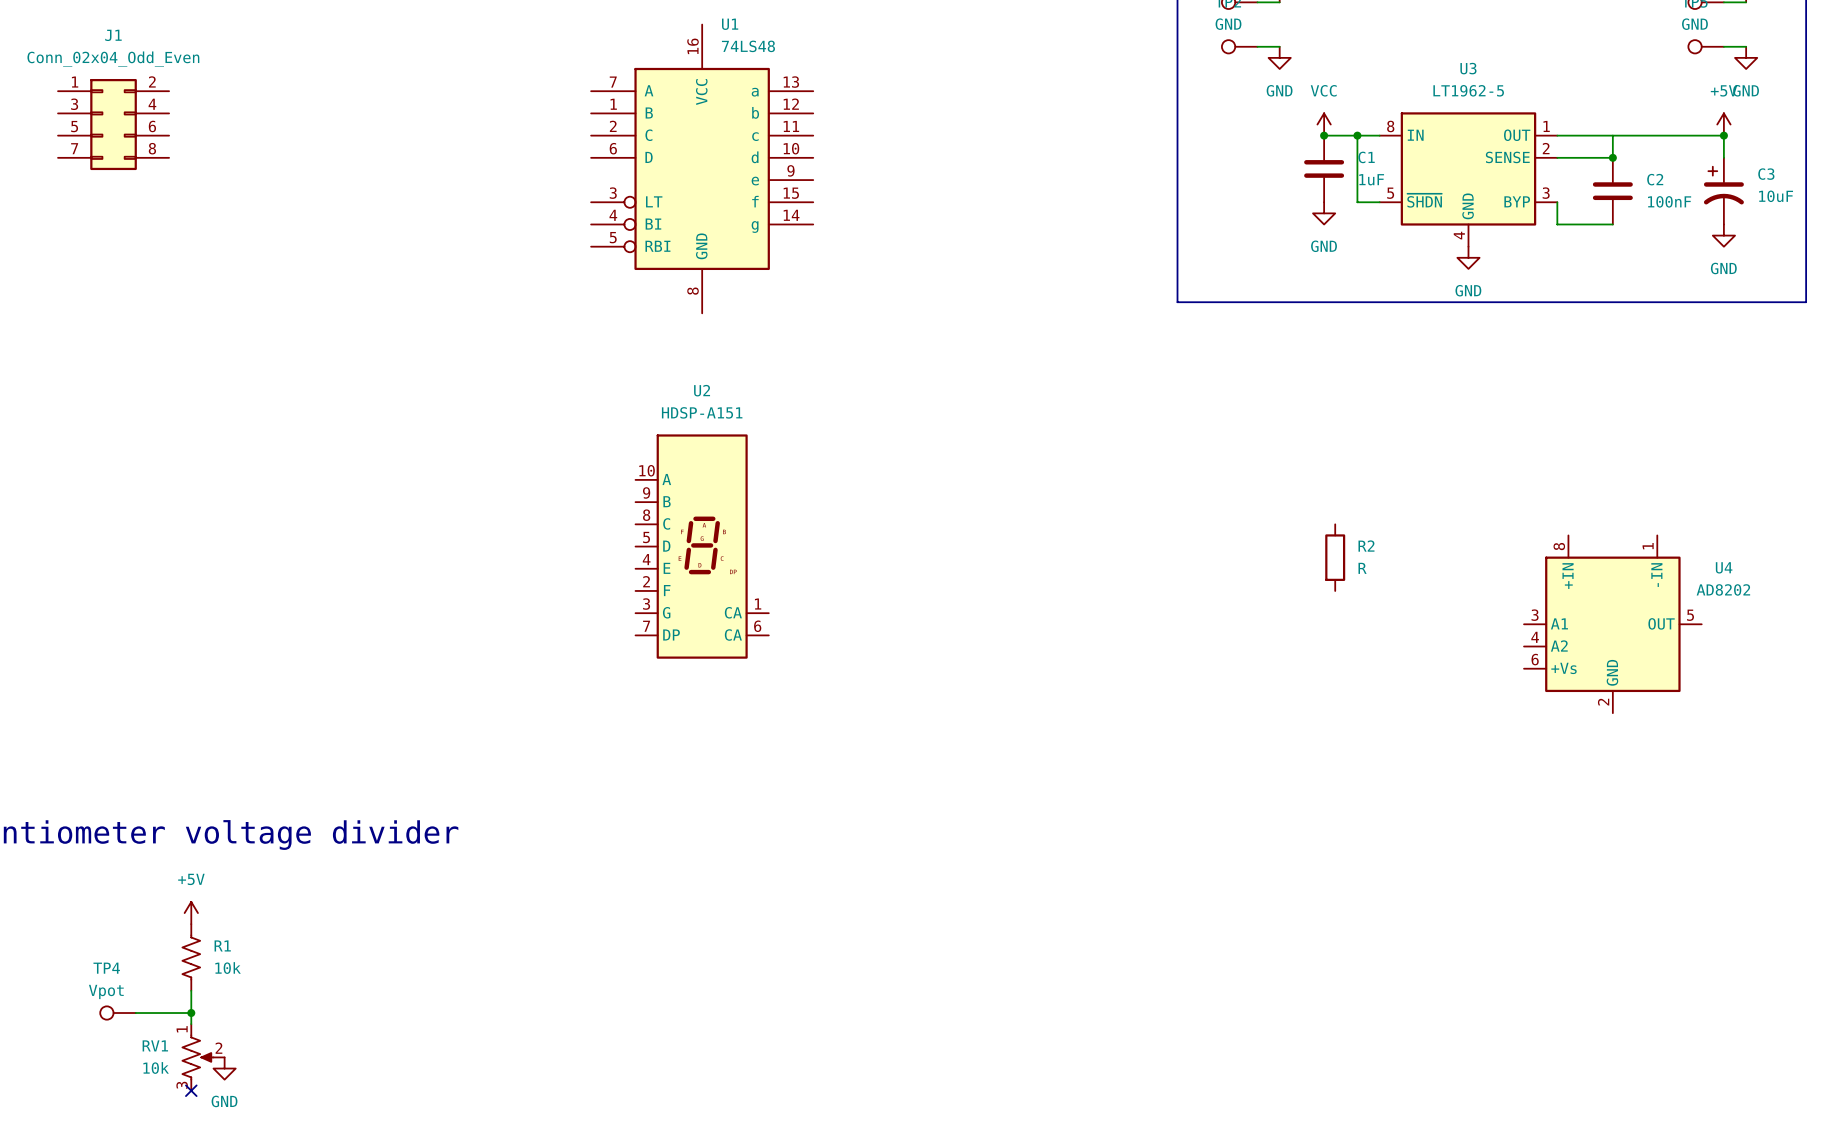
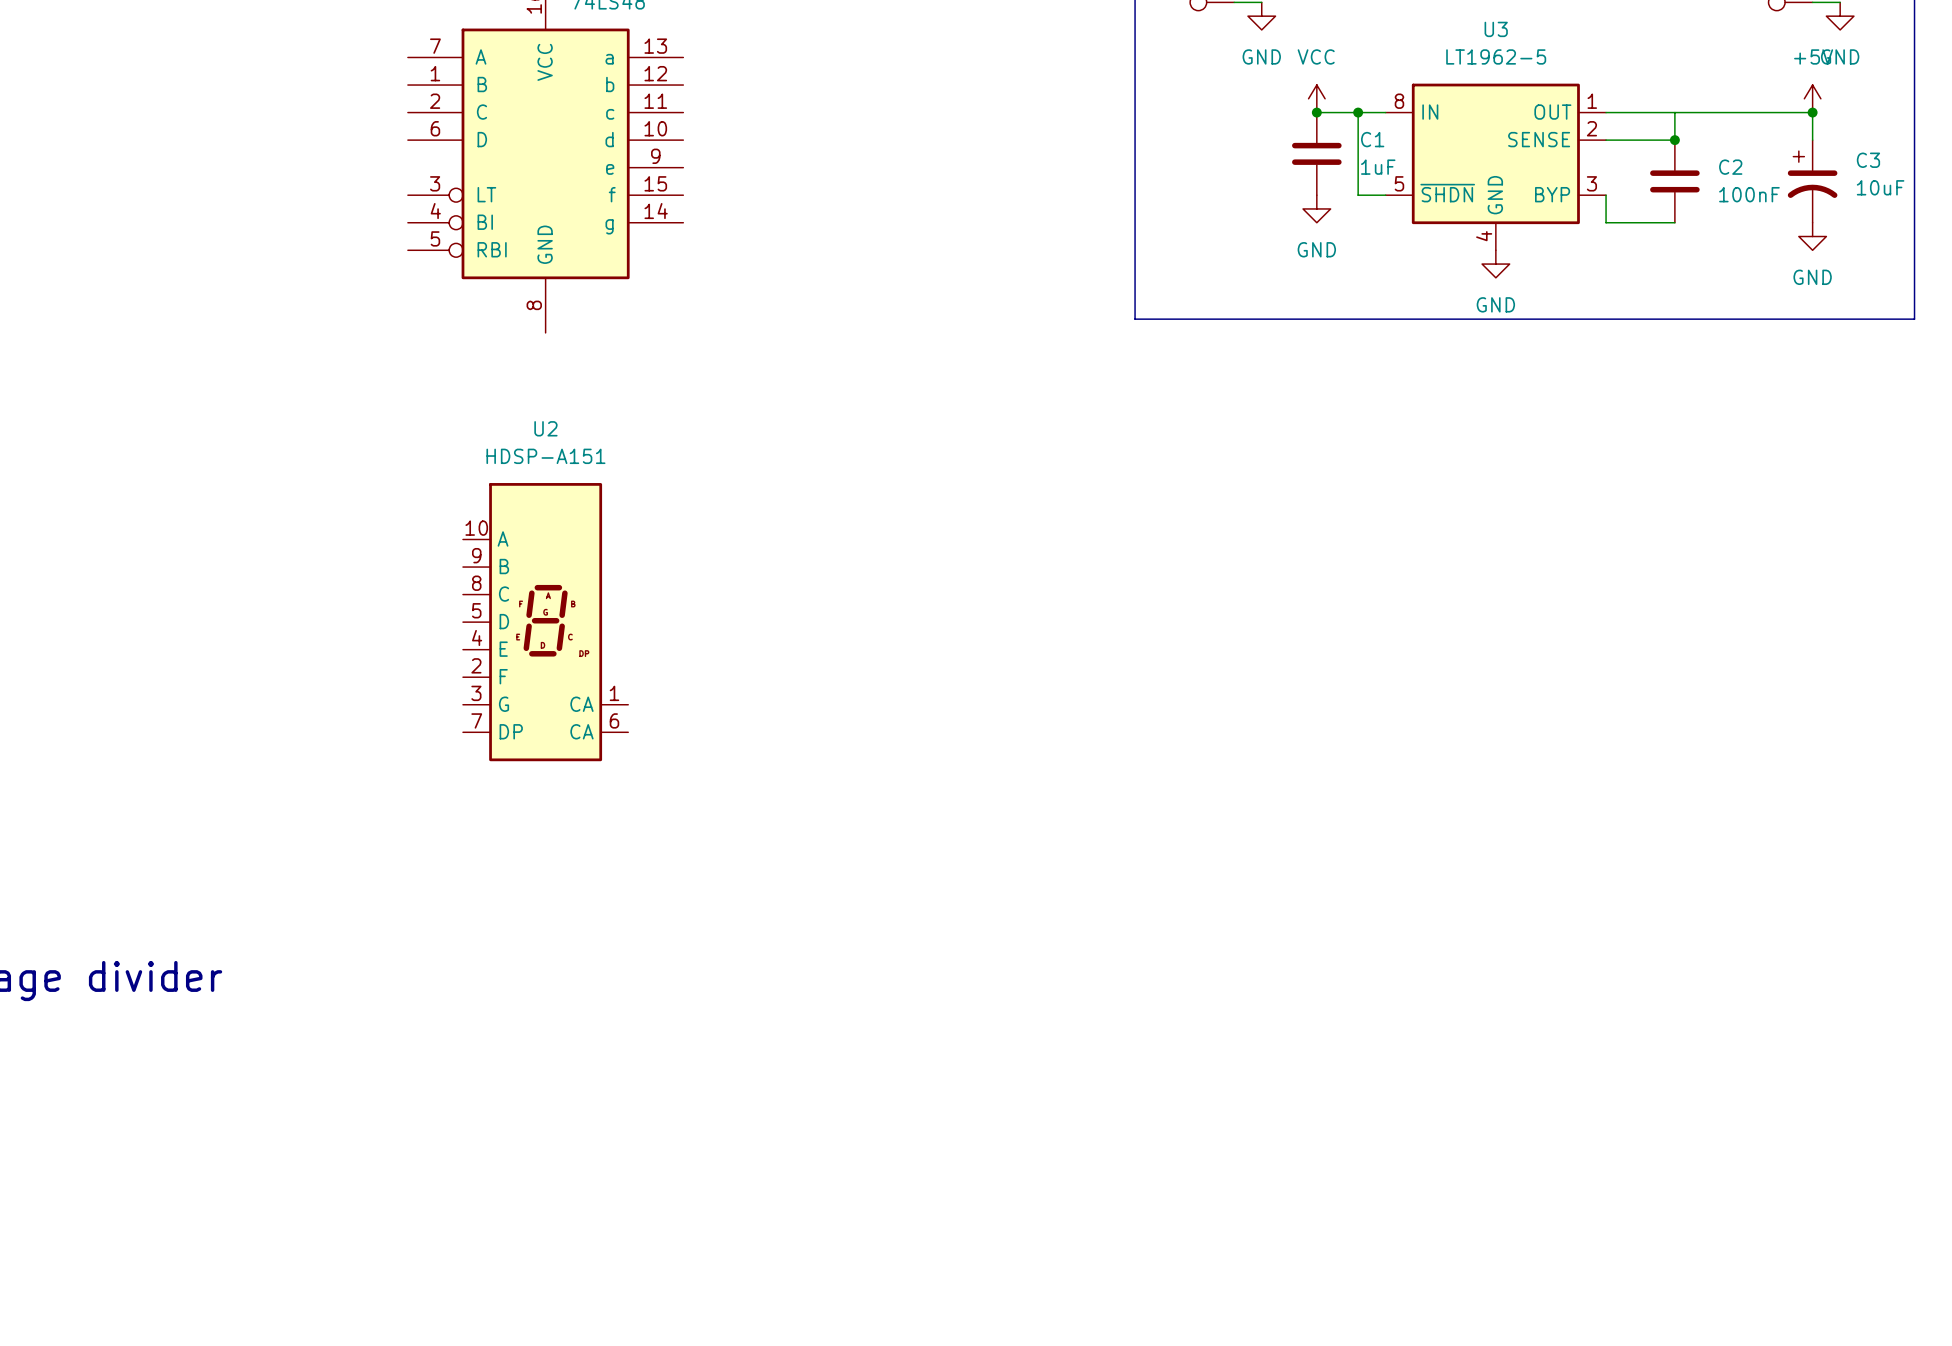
R2: R (1335, 557) -> none
U4: AD8202 (1612, 624) -> none

